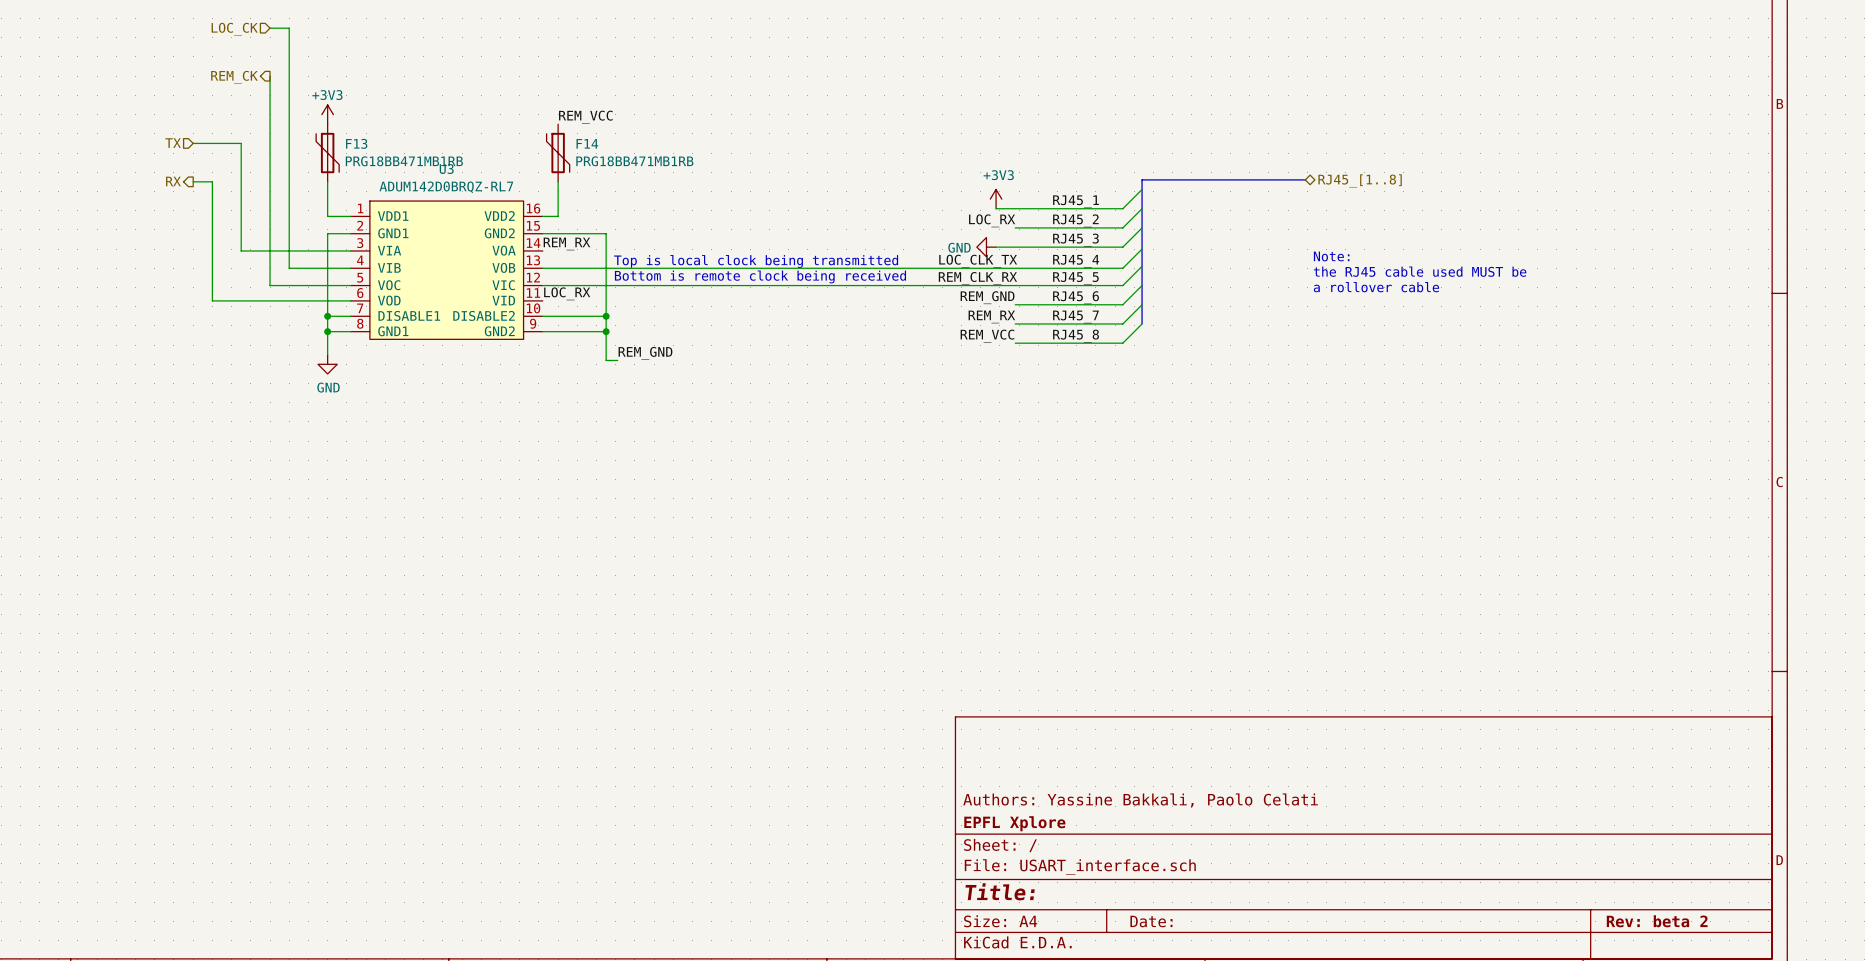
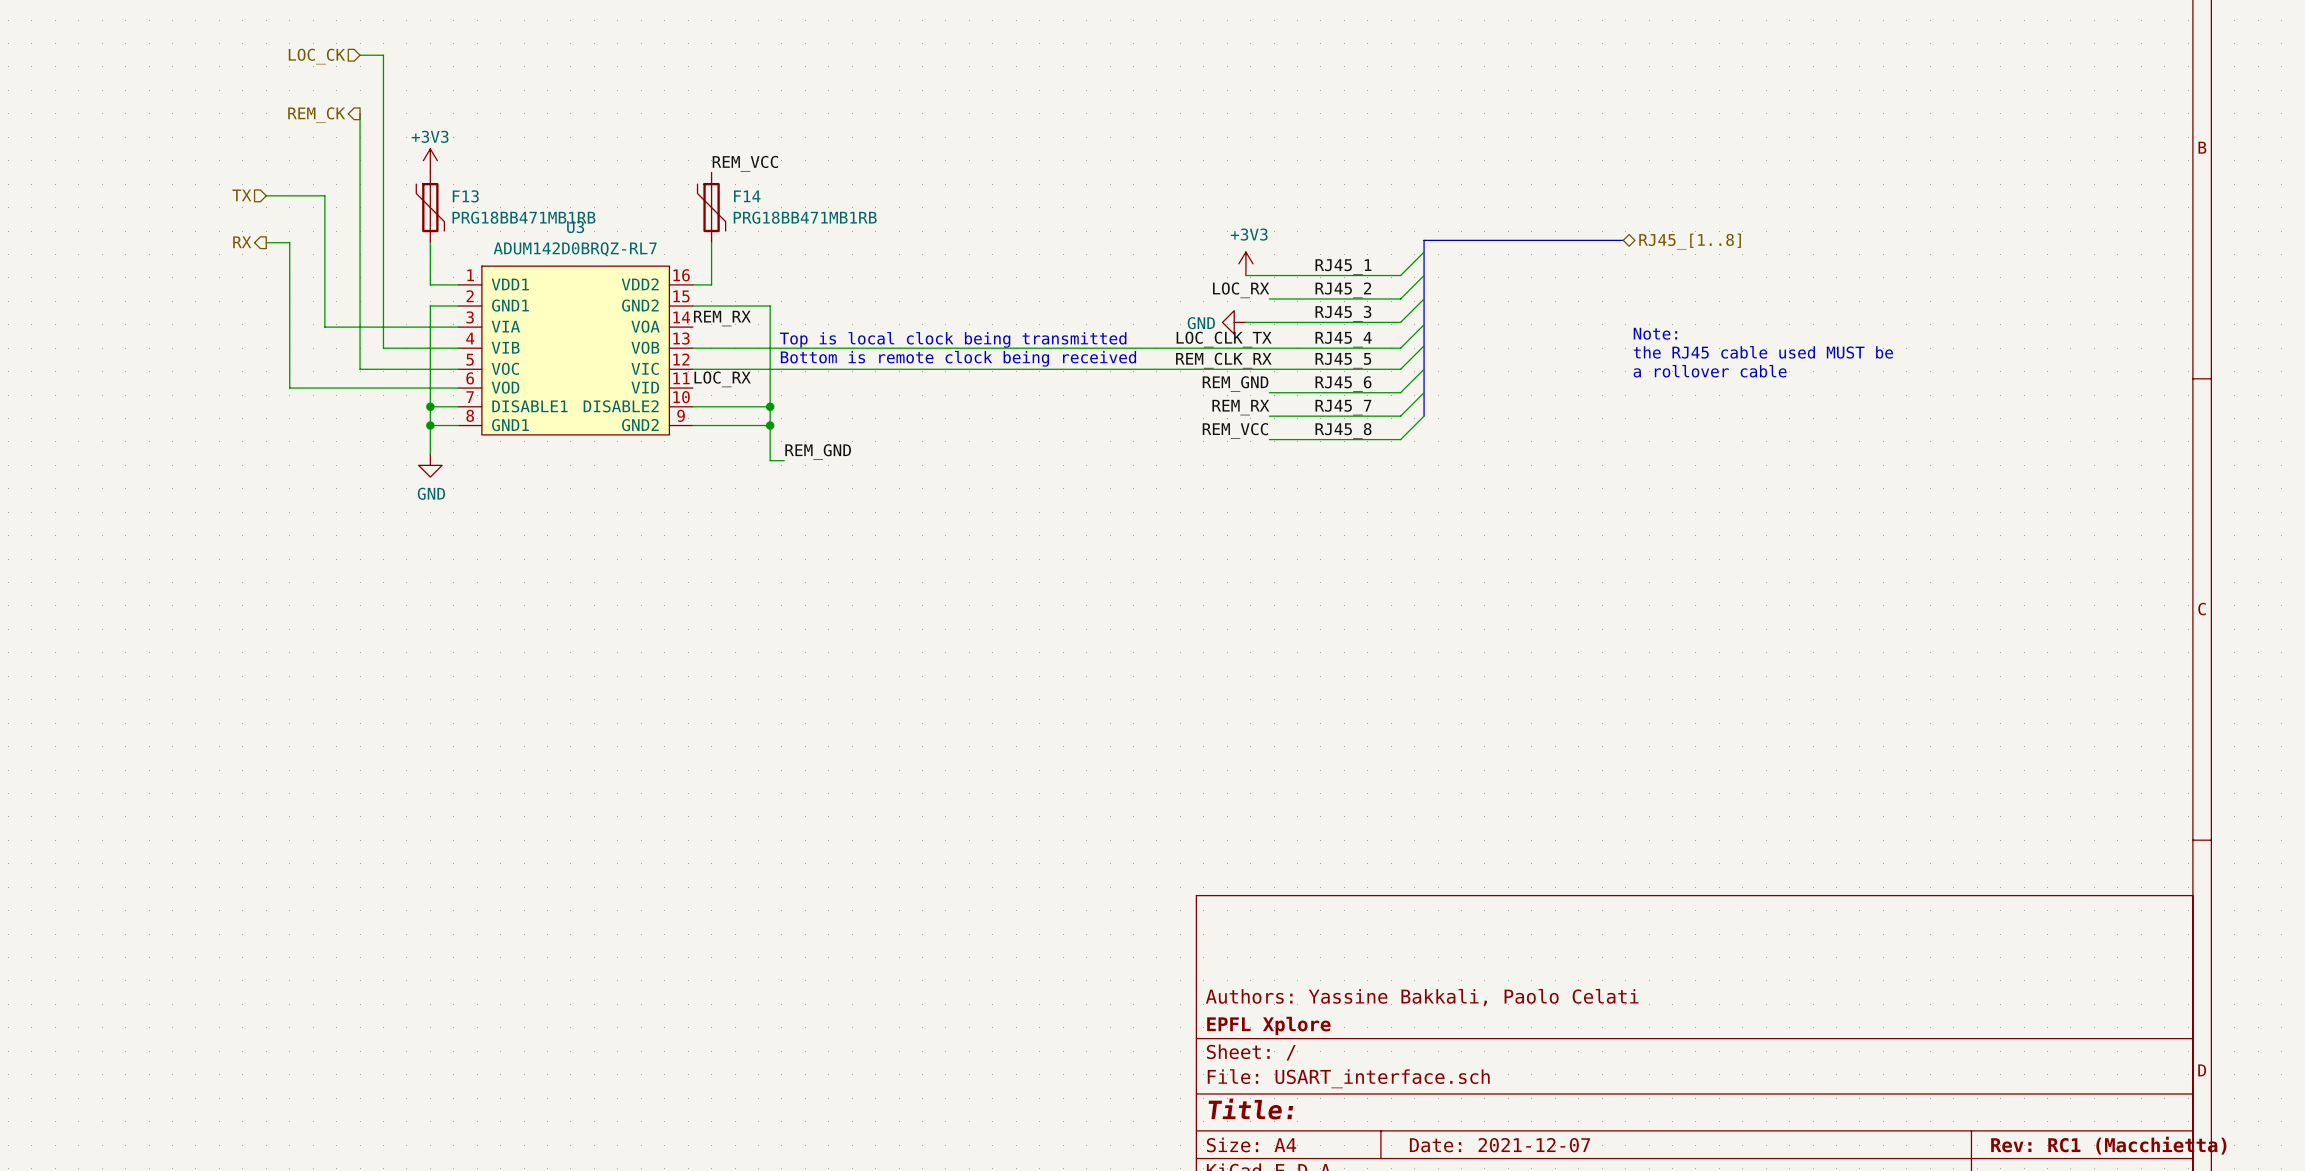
title block: Date: (1151, 921) -> Date: 2021-12-07 (1499, 1145)
title block: Rev: beta 2 (1657, 921) -> Rev: RC1 (Macchietta) (2108, 1145)

